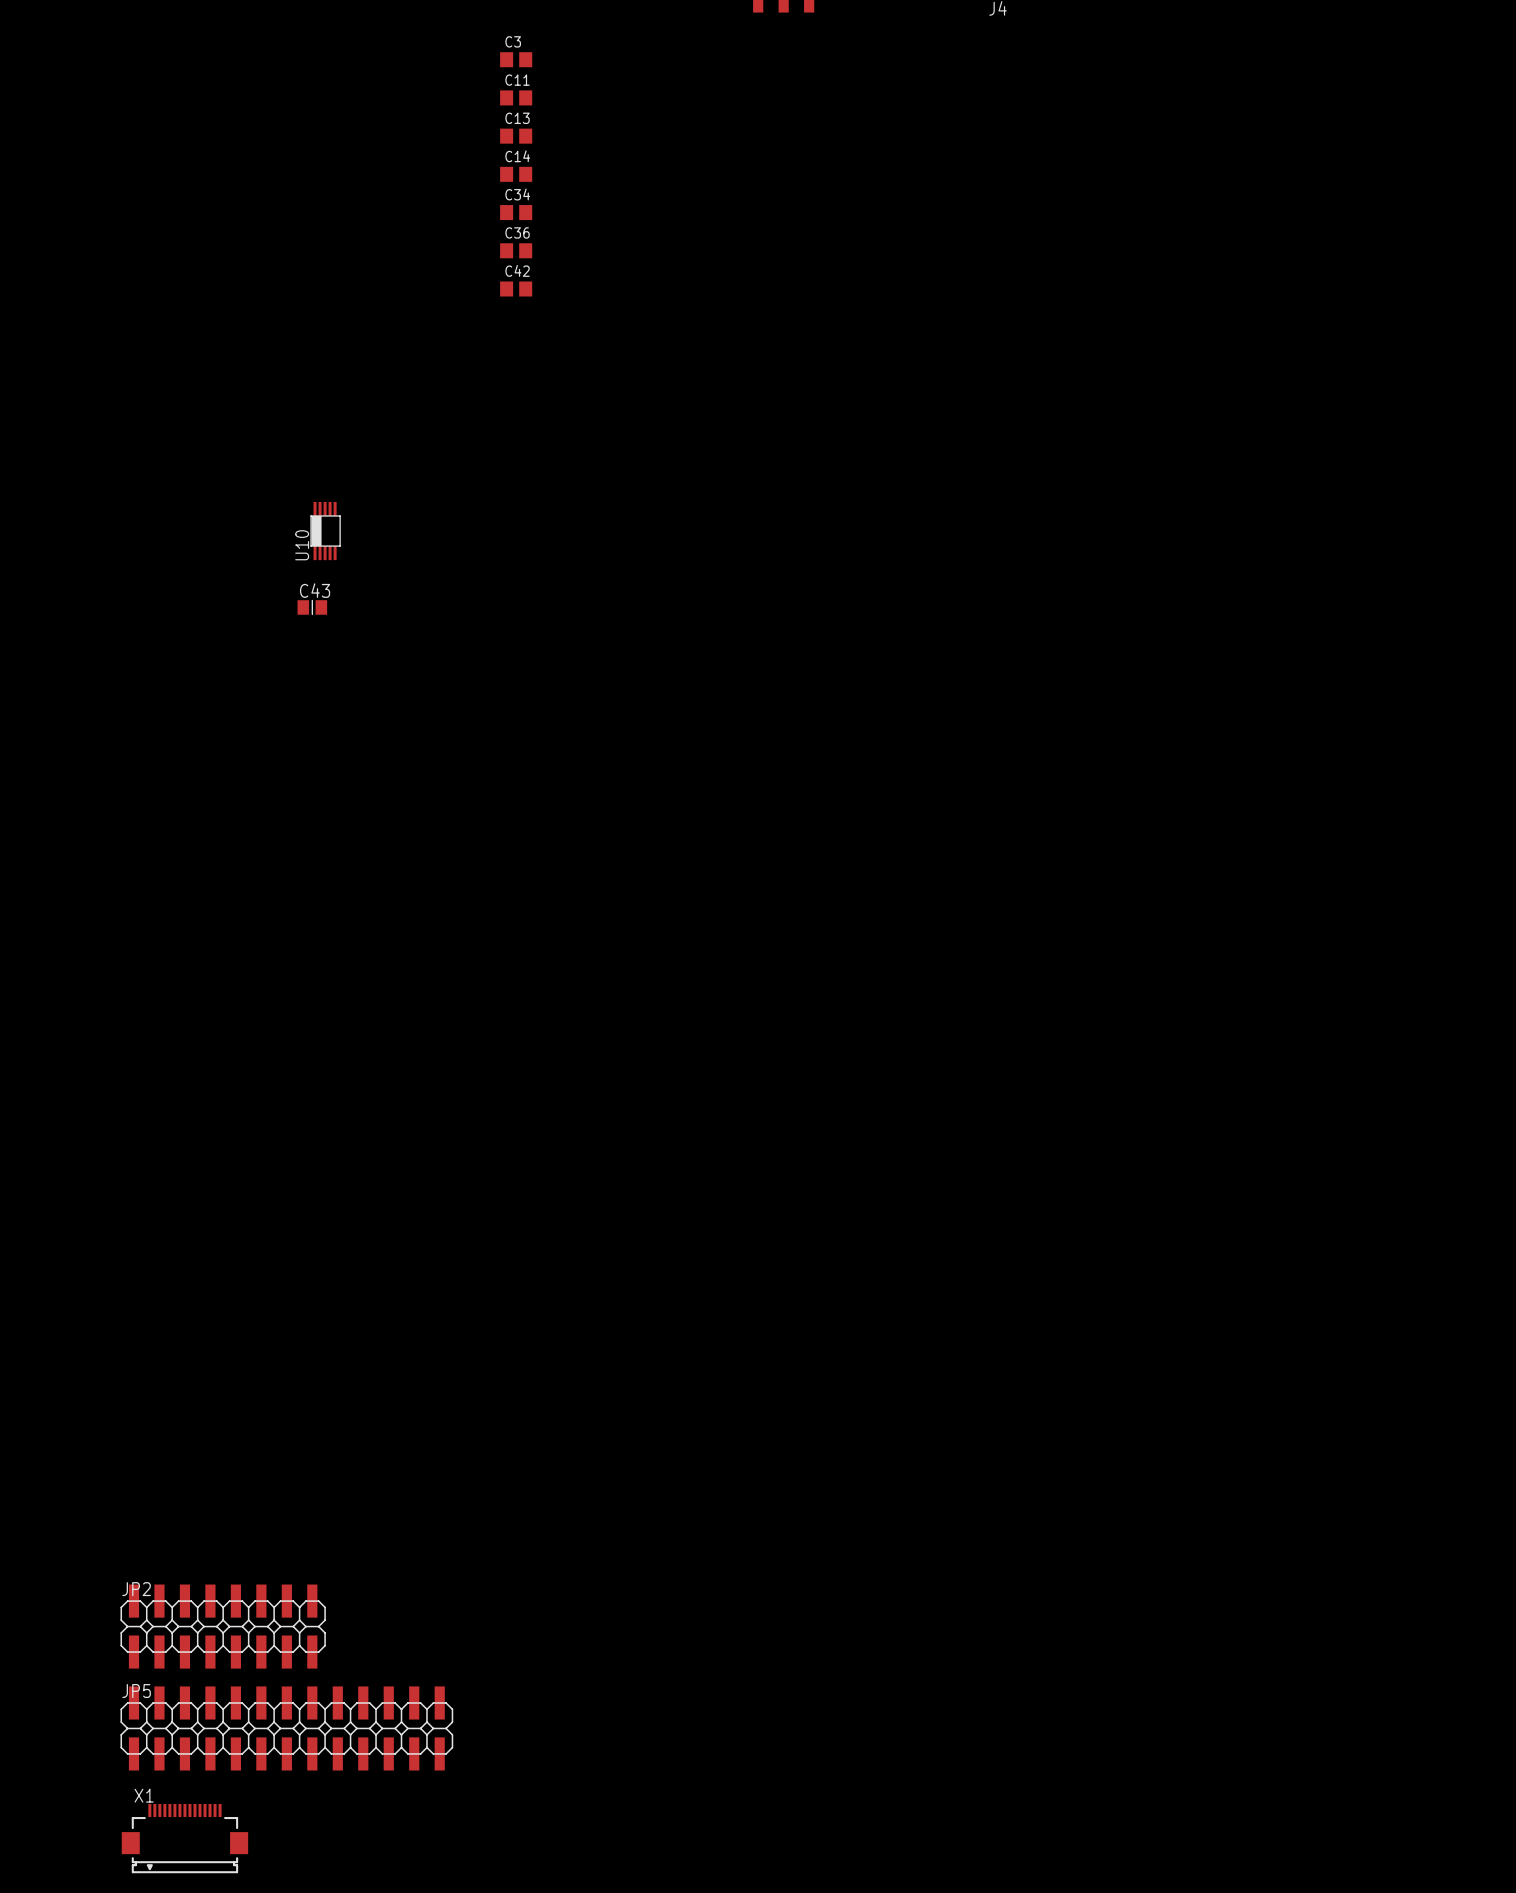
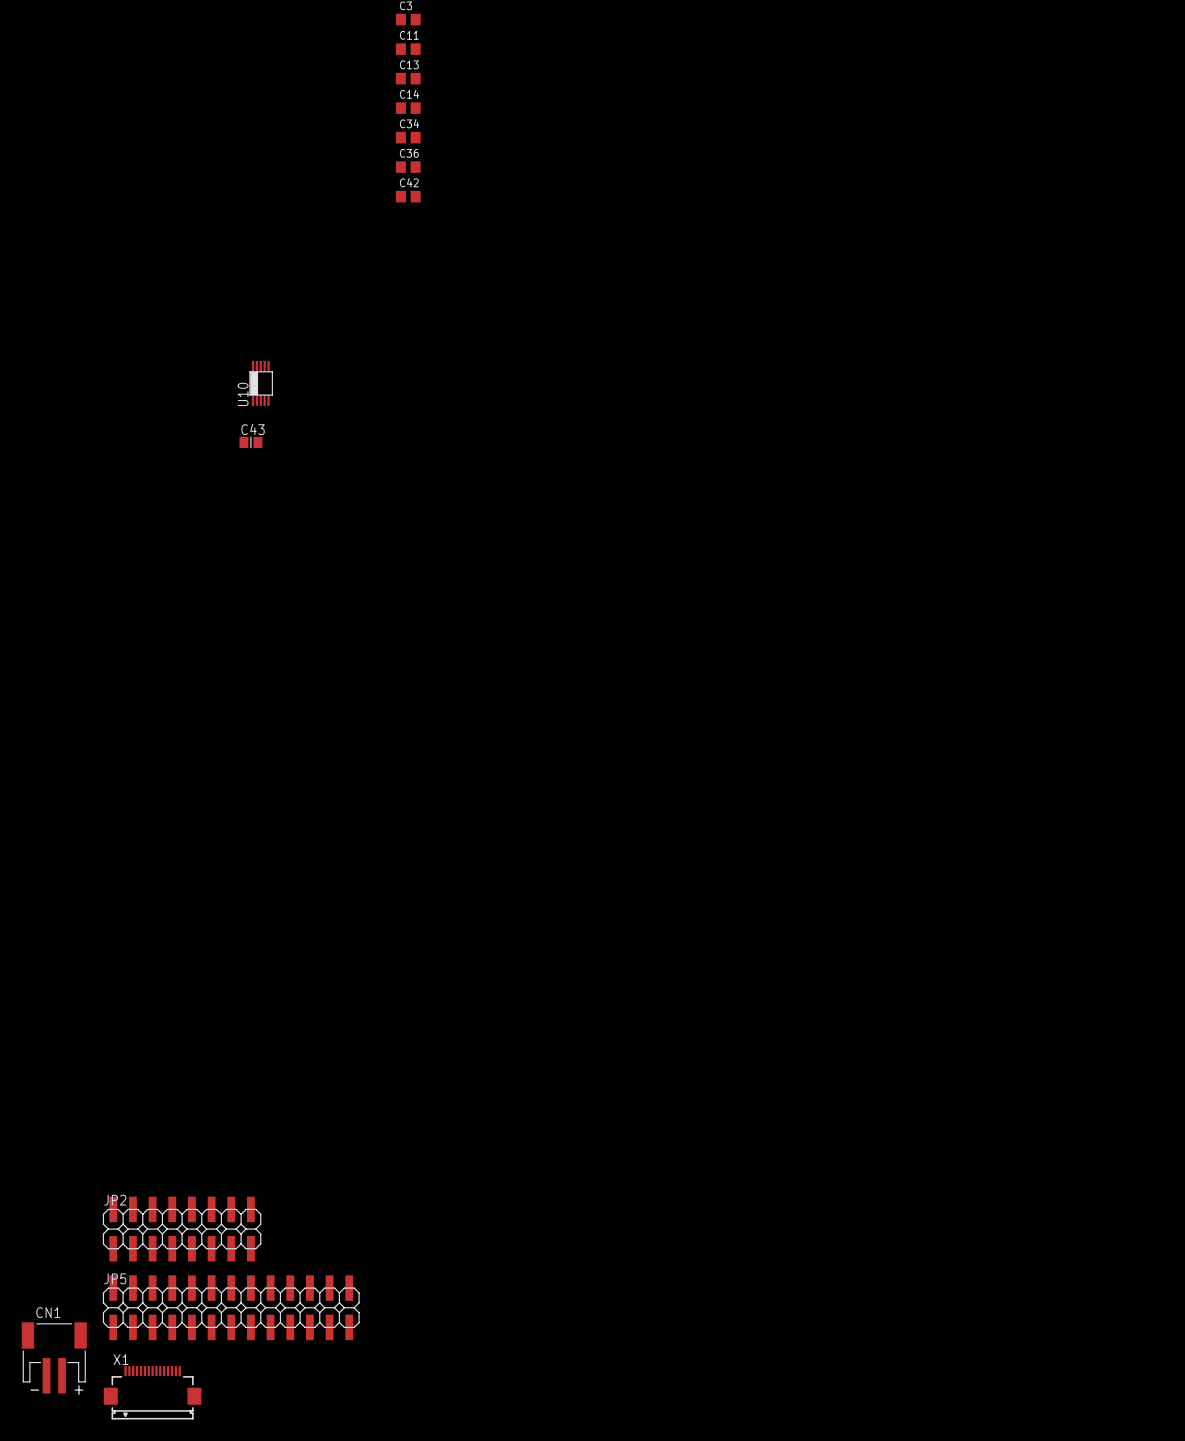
CN1: none -> (54, 1357)

